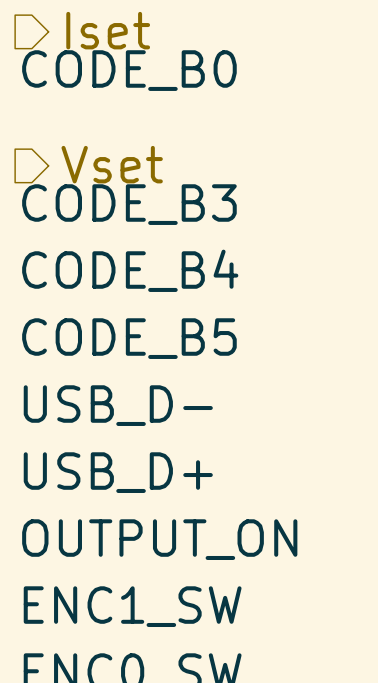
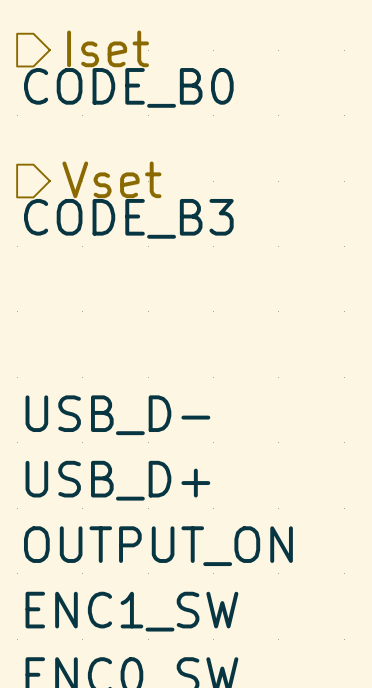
label: CODE_B4 (130, 270) -> none
label: CODE_B5 (129, 338) -> none

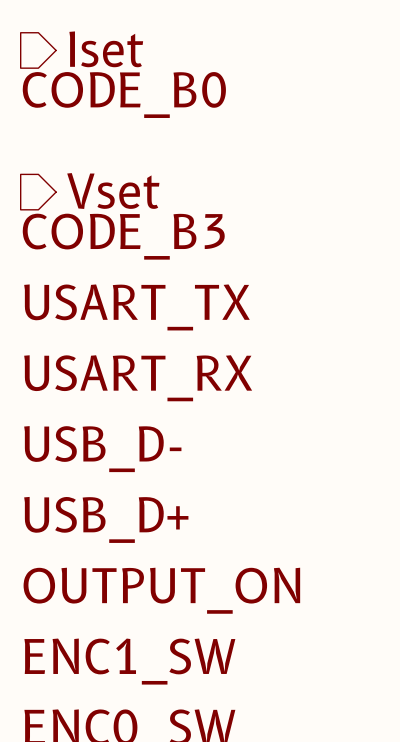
label: none -> USART_TX (136, 307)
label: none -> USART_RX (138, 378)

